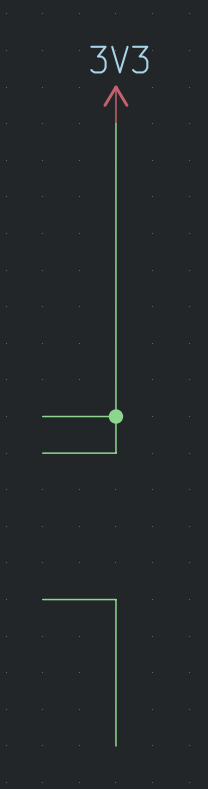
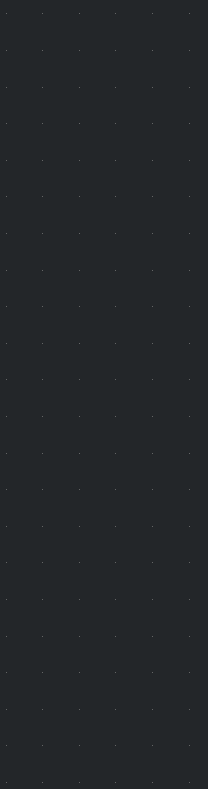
power symbol: 3V3 (115, 104) -> none
wire: (115, 123) (115, 453) (42, 453) -> none
wire: (42, 416) (115, 416) -> none
junction: (115, 416) -> none
wire: (42, 599) (115, 599) (115, 745) -> none

